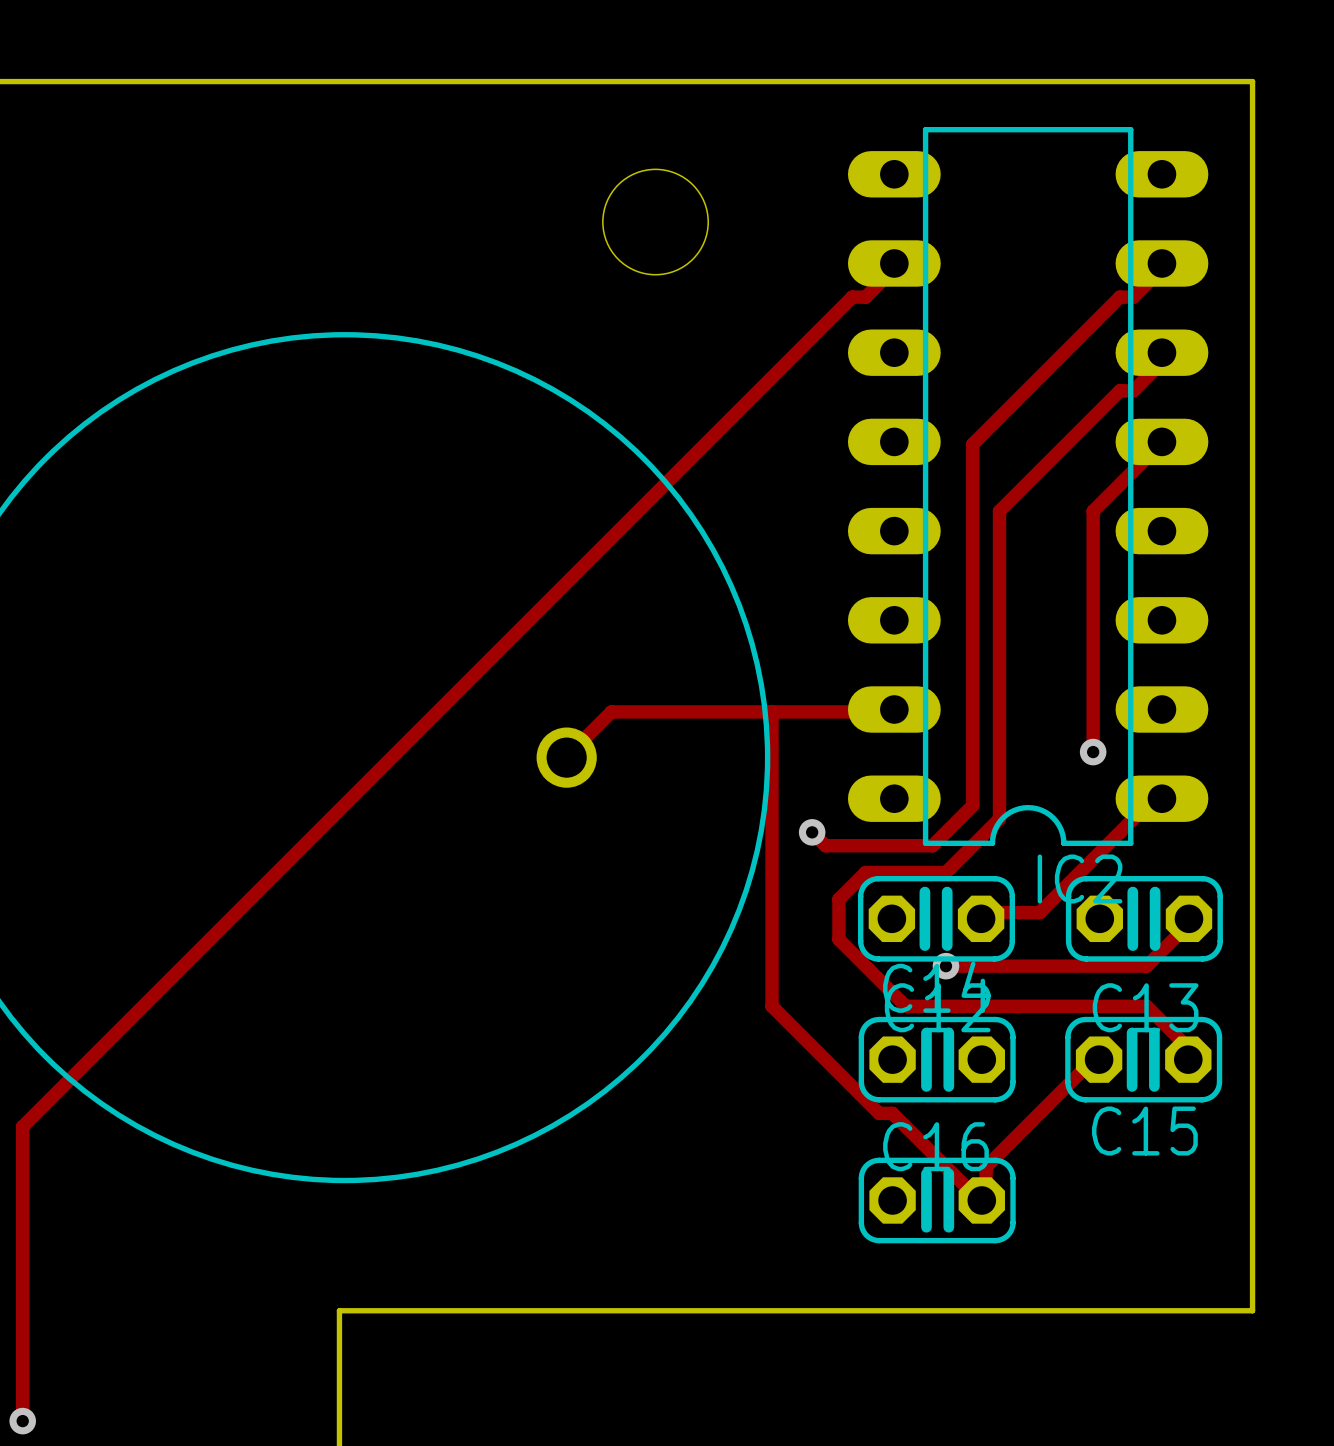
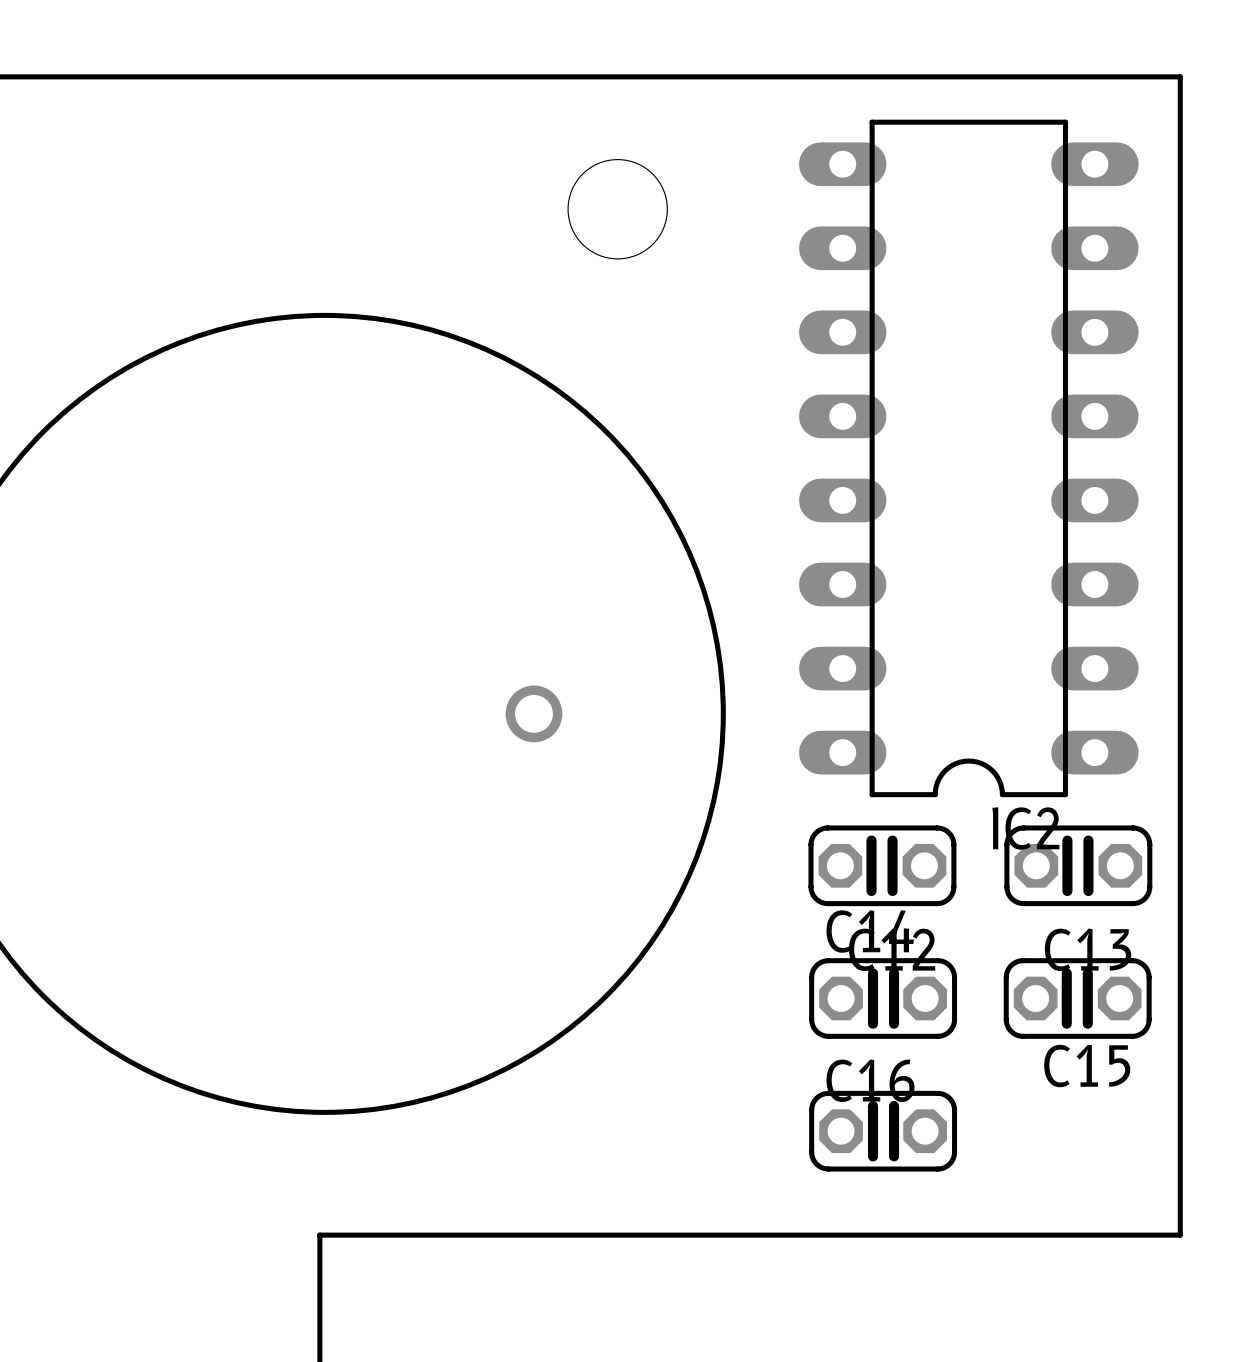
track: (894, 263) (892, 270) (865, 297) (852, 297) (22, 1126) (22, 1421) -> none
track: (1161, 263) (1160, 270) (1133, 297) (1119, 297) (972, 444) (972, 805) (932, 845) (825, 845) (812, 832) -> none
track: (1161, 352) (1160, 364) (1133, 390) (1119, 390) (999, 511) (999, 818) (945, 872) (865, 872) (838, 899) (838, 939) (905, 1006) (1146, 1006) (1186, 1046) (1188, 1059) -> none
track: (1161, 441) (1093, 511) (1093, 752) -> none
track: (894, 709) (892, 711) (611, 711) (566, 757) -> none
track: (772, 711) (772, 1006) (879, 1113) (892, 1113) (981, 1200) (986, 1193) (986, 1166) (1093, 1059) (1099, 1059) -> none
via: (1093, 752) -> none
track: (1161, 798) (1160, 792) (1039, 912) (986, 912) (981, 918) -> none
via: (812, 832) -> none
track: (1189, 918) (1186, 926) (1146, 966) (945, 966) -> none
via: (945, 966) -> none
via: (22, 1421) -> none

